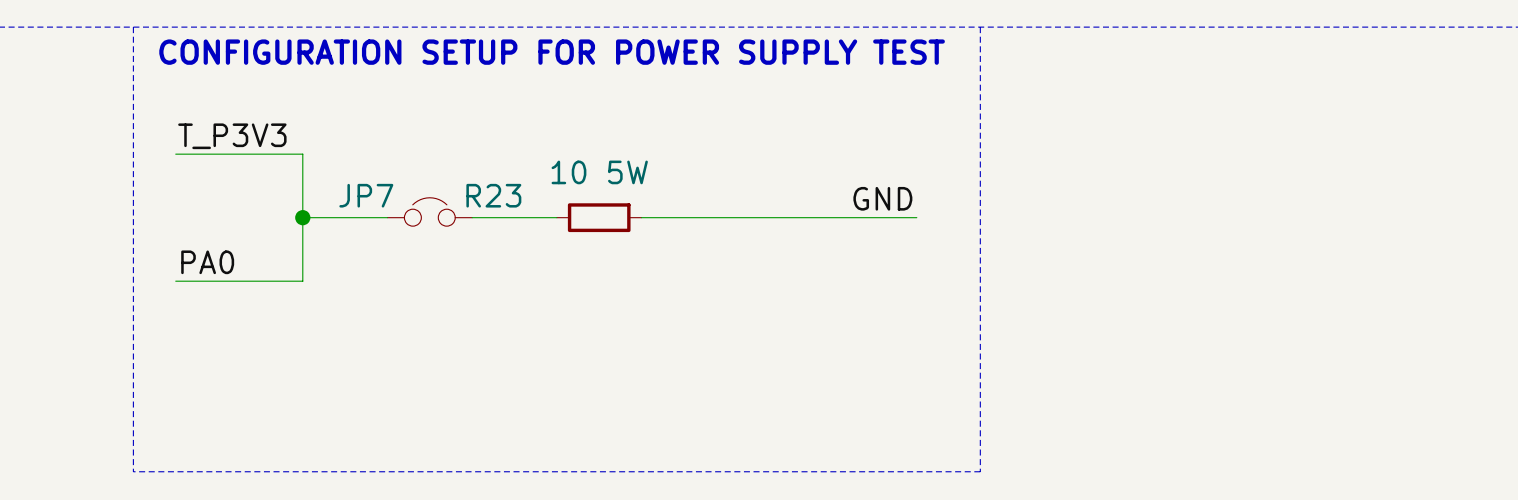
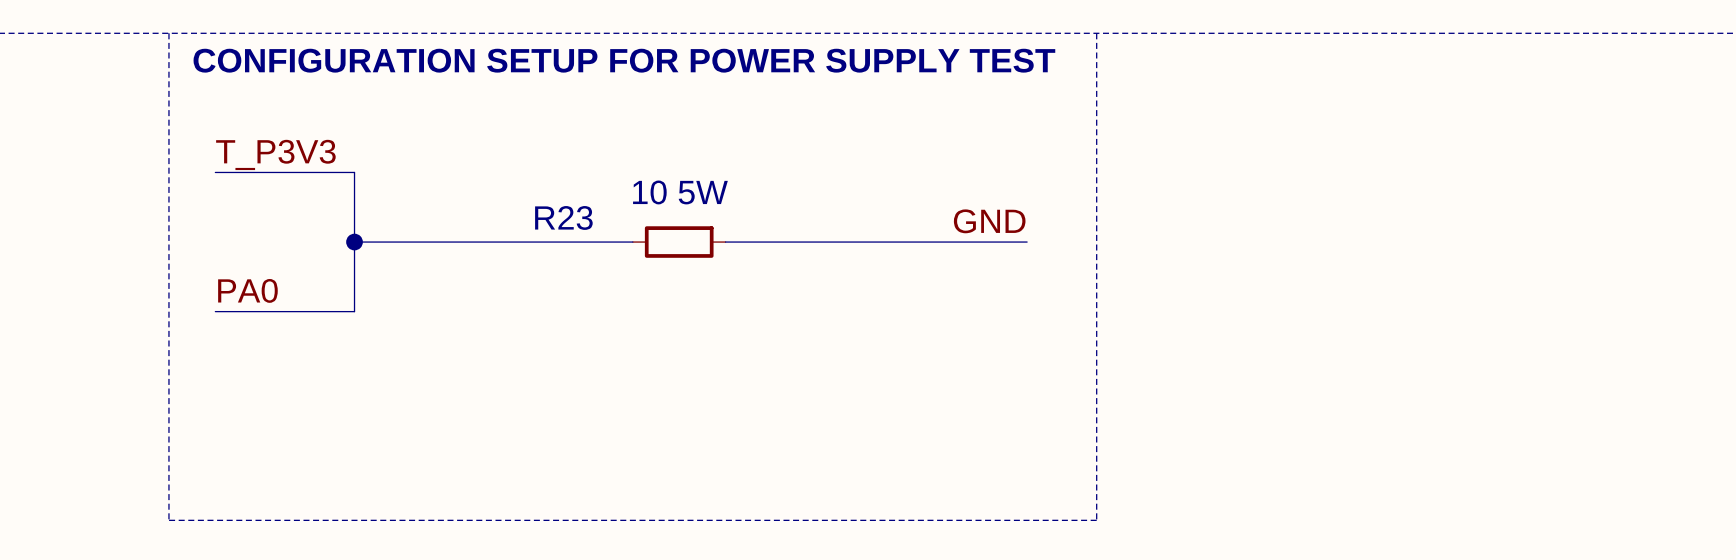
JP7: (429, 211) -> none
wire: none -> (447, 242) (540, 242)

